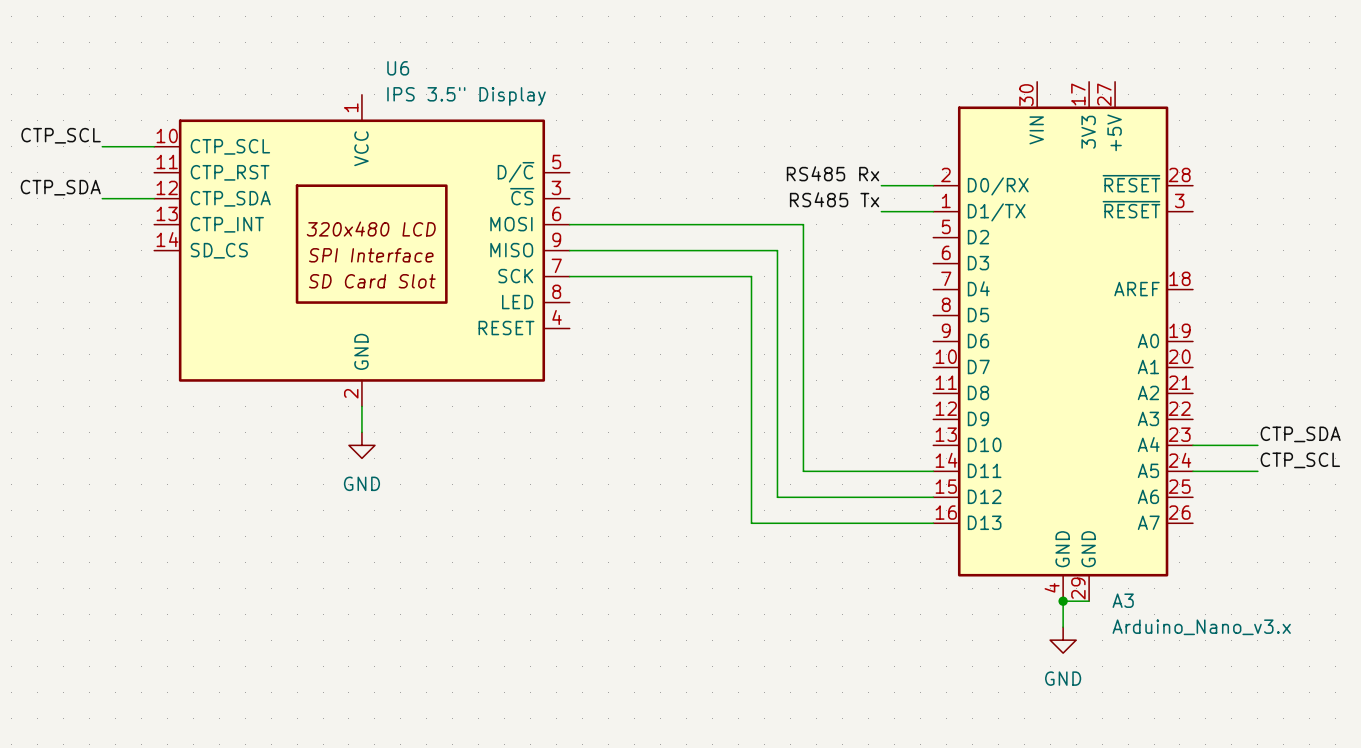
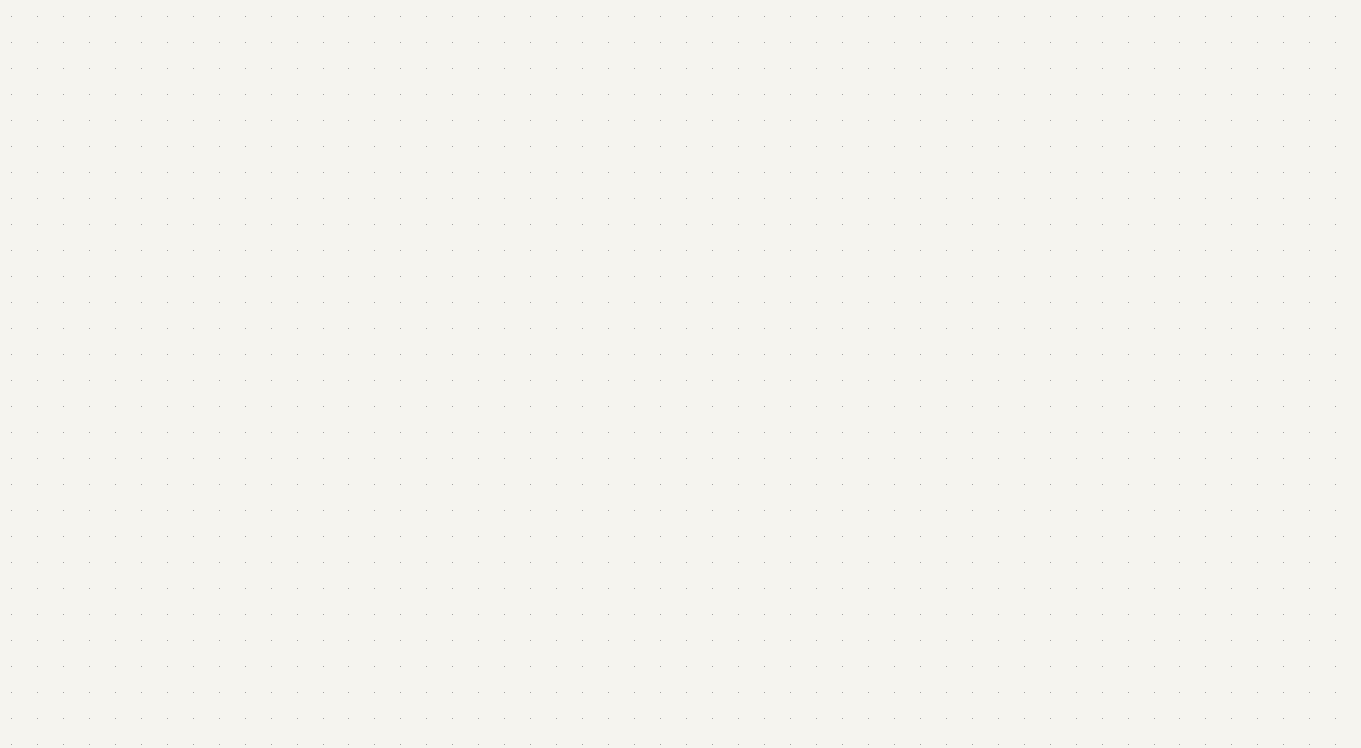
label: CTP_SCL (61, 135) -> none
wire: (102, 146) (154, 146) -> none
label: RS485 Rx (833, 173) -> none
wire: (881, 185) (933, 185) -> none
label: CTP_SDA (60, 187) -> none
wire: (102, 198) (154, 198) -> none
label: RS485 Tx (834, 199) -> none
wire: (881, 211) (933, 211) -> none
wire: (569, 224) (803, 224) (803, 471) (933, 471) -> none
U6: IPS 3.5" Display (361, 250) -> none
wire: (569, 250) (777, 250) (777, 497) (933, 497) -> none
wire: (569, 276) (751, 276) (751, 523) (933, 523) -> none
A3: Arduino_Nano_v3.x (1063, 341) -> none
wire: (361, 406) (361, 432) -> none
label: CTP_SDA (1300, 434) -> none
power symbol: GND (361, 445) -> none
wire: (1192, 445) (1257, 445) -> none
label: CTP_SCL (1300, 460) -> none
wire: (1192, 471) (1257, 471) -> none
junction: (1063, 601) -> none
wire: (1089, 601) (1063, 601) (1063, 627) -> none
power symbol: GND (1063, 640) -> none

